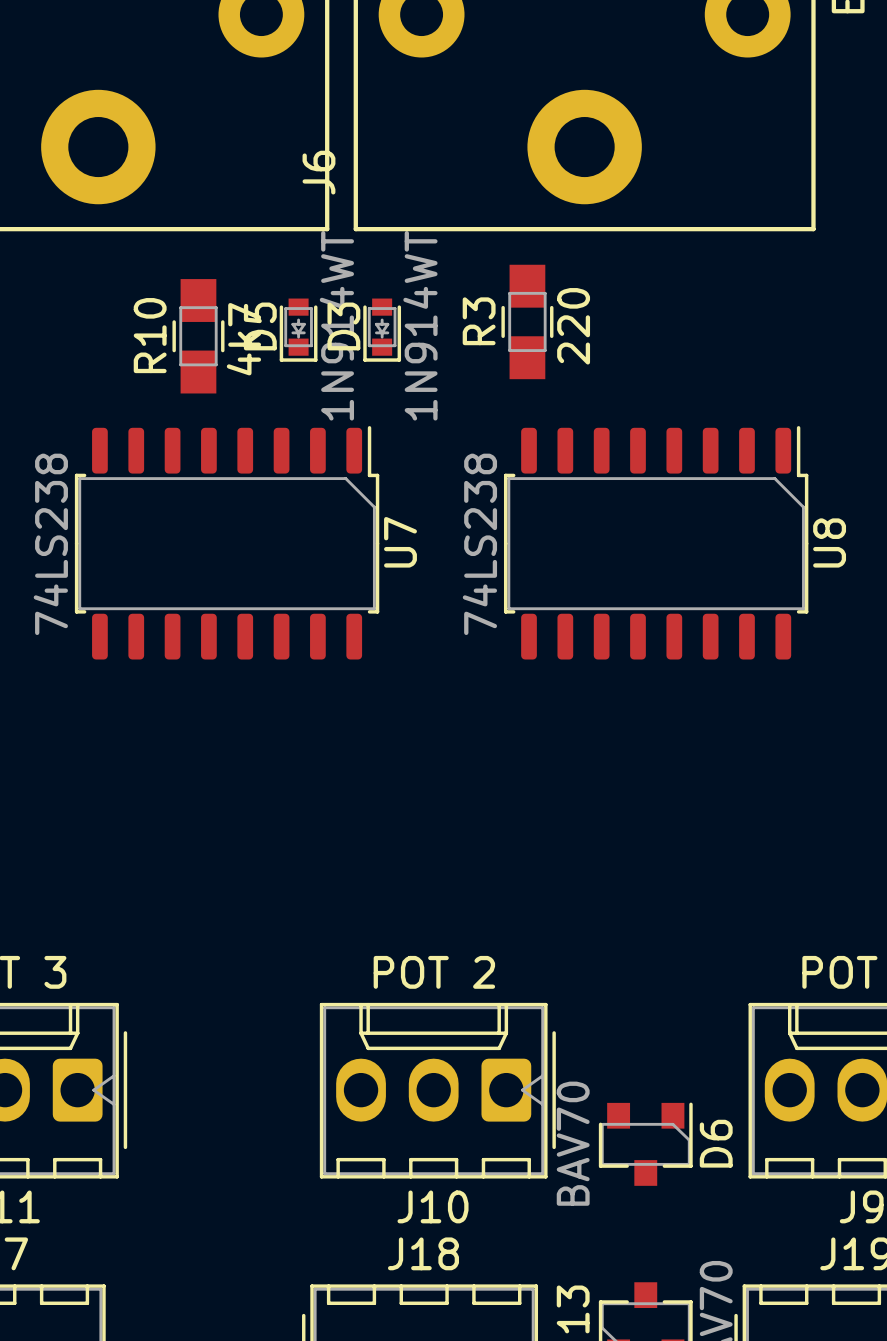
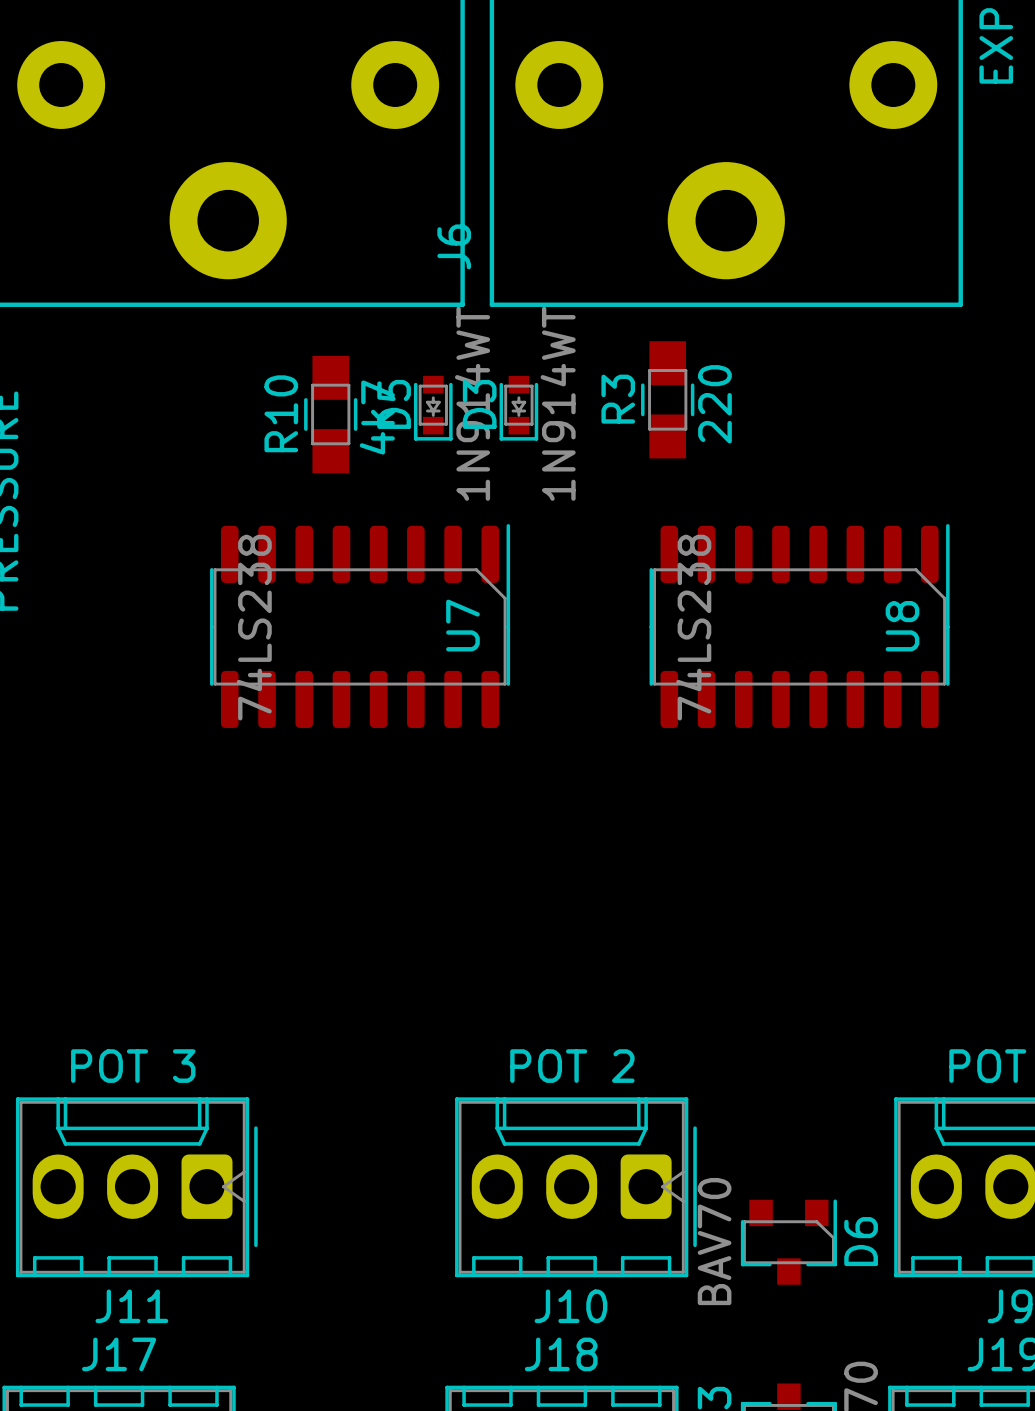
U7 footprint: [74, 426, 380, 660] -> [210, 524, 511, 729]
U8 footprint: [503, 426, 809, 660] -> [649, 524, 950, 729]
U7 name position: U7 (400, 542) -> U7 (462, 625)
U8 name position: U8 (829, 542) -> U8 (902, 626)
U7 value position: 74LS238 (50, 544) -> 74LS238 (254, 627)
U8 value position: 74LS238 (479, 544) -> 74LS238 (693, 627)

